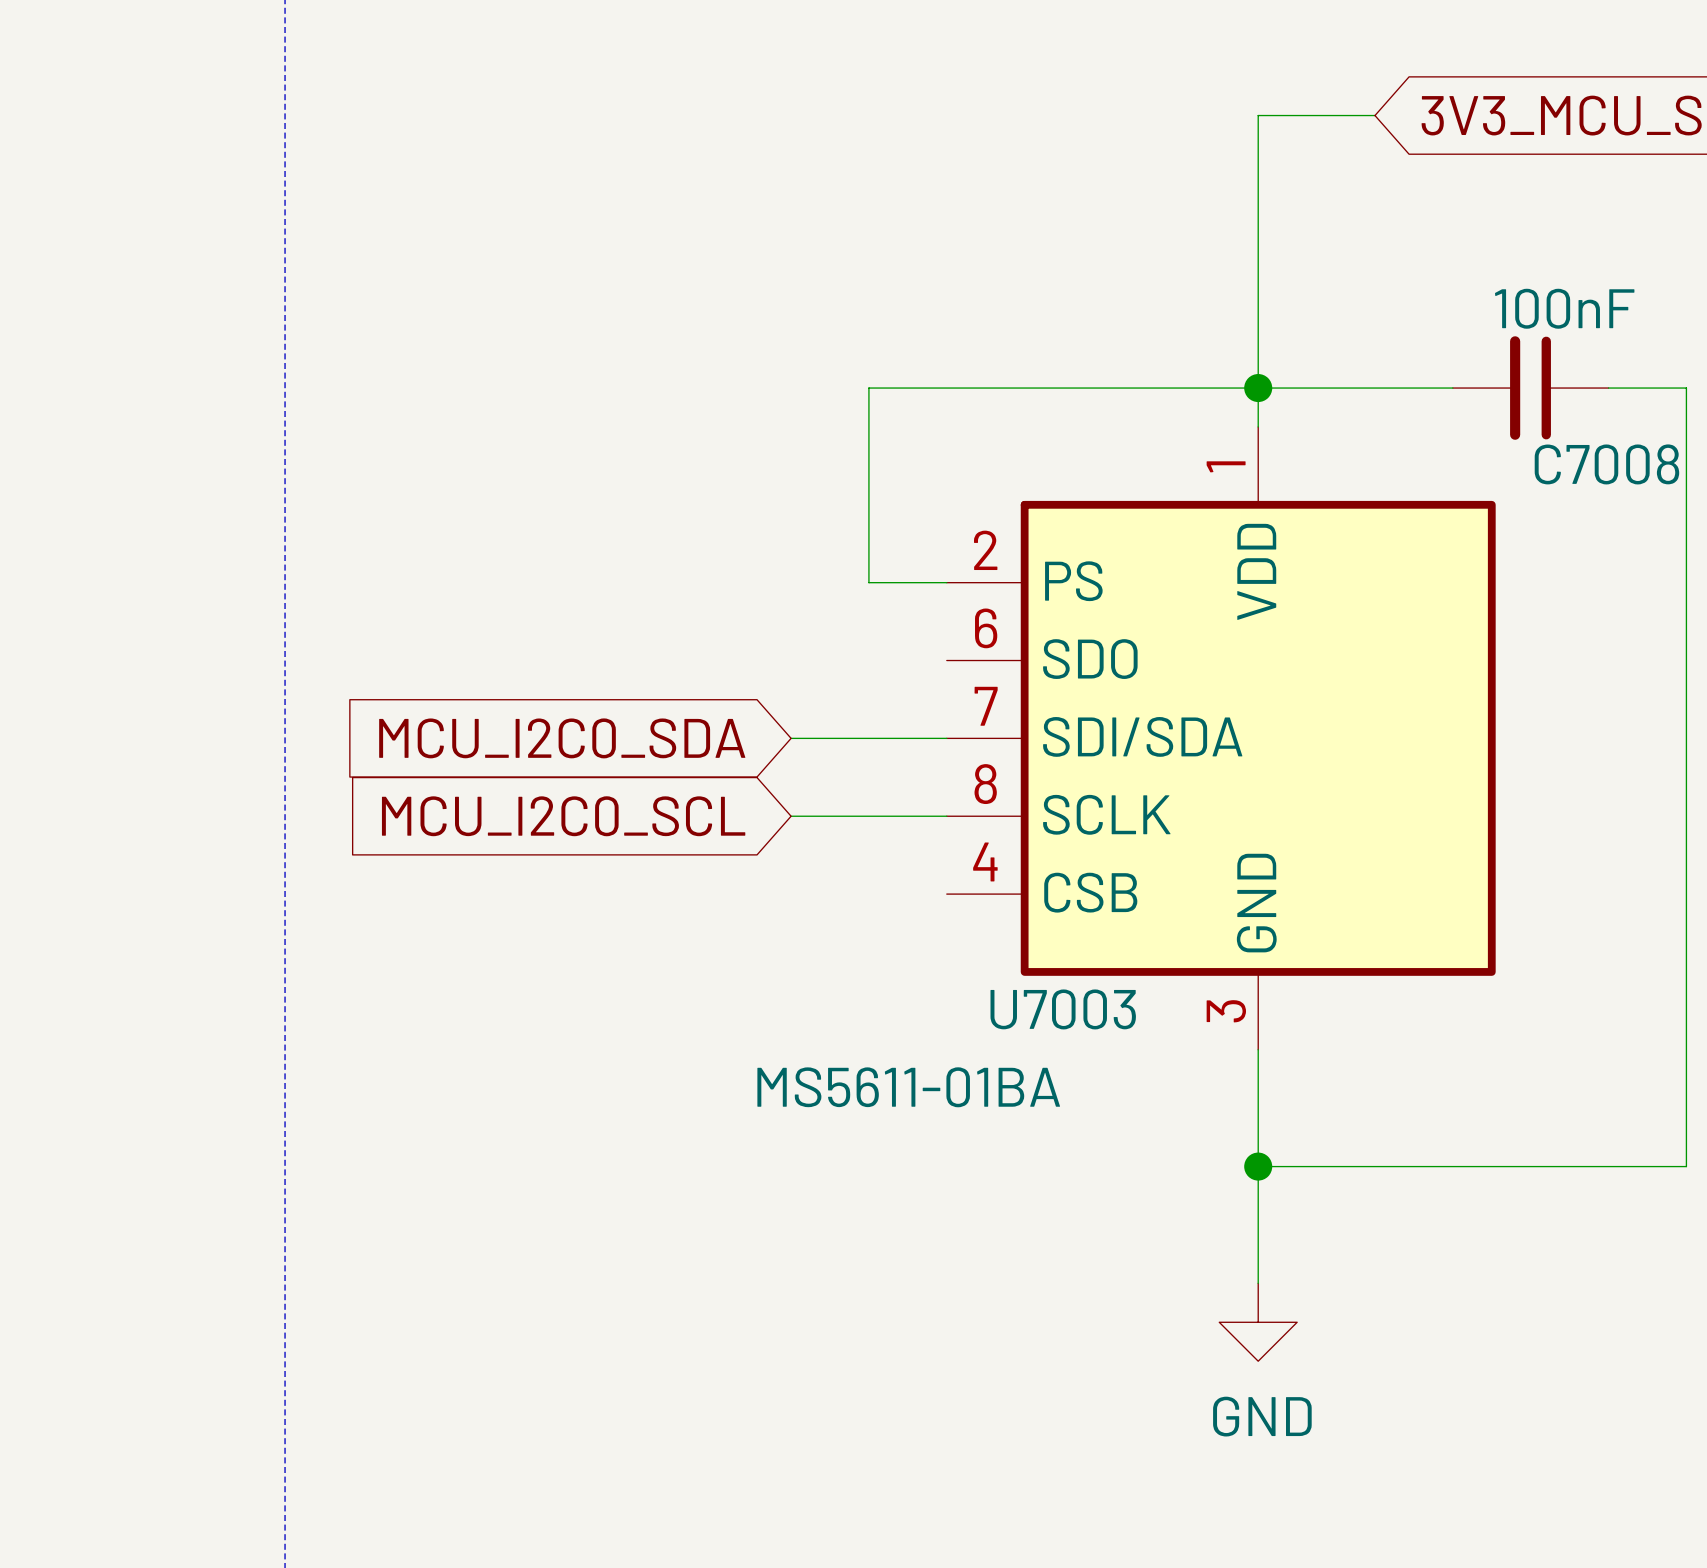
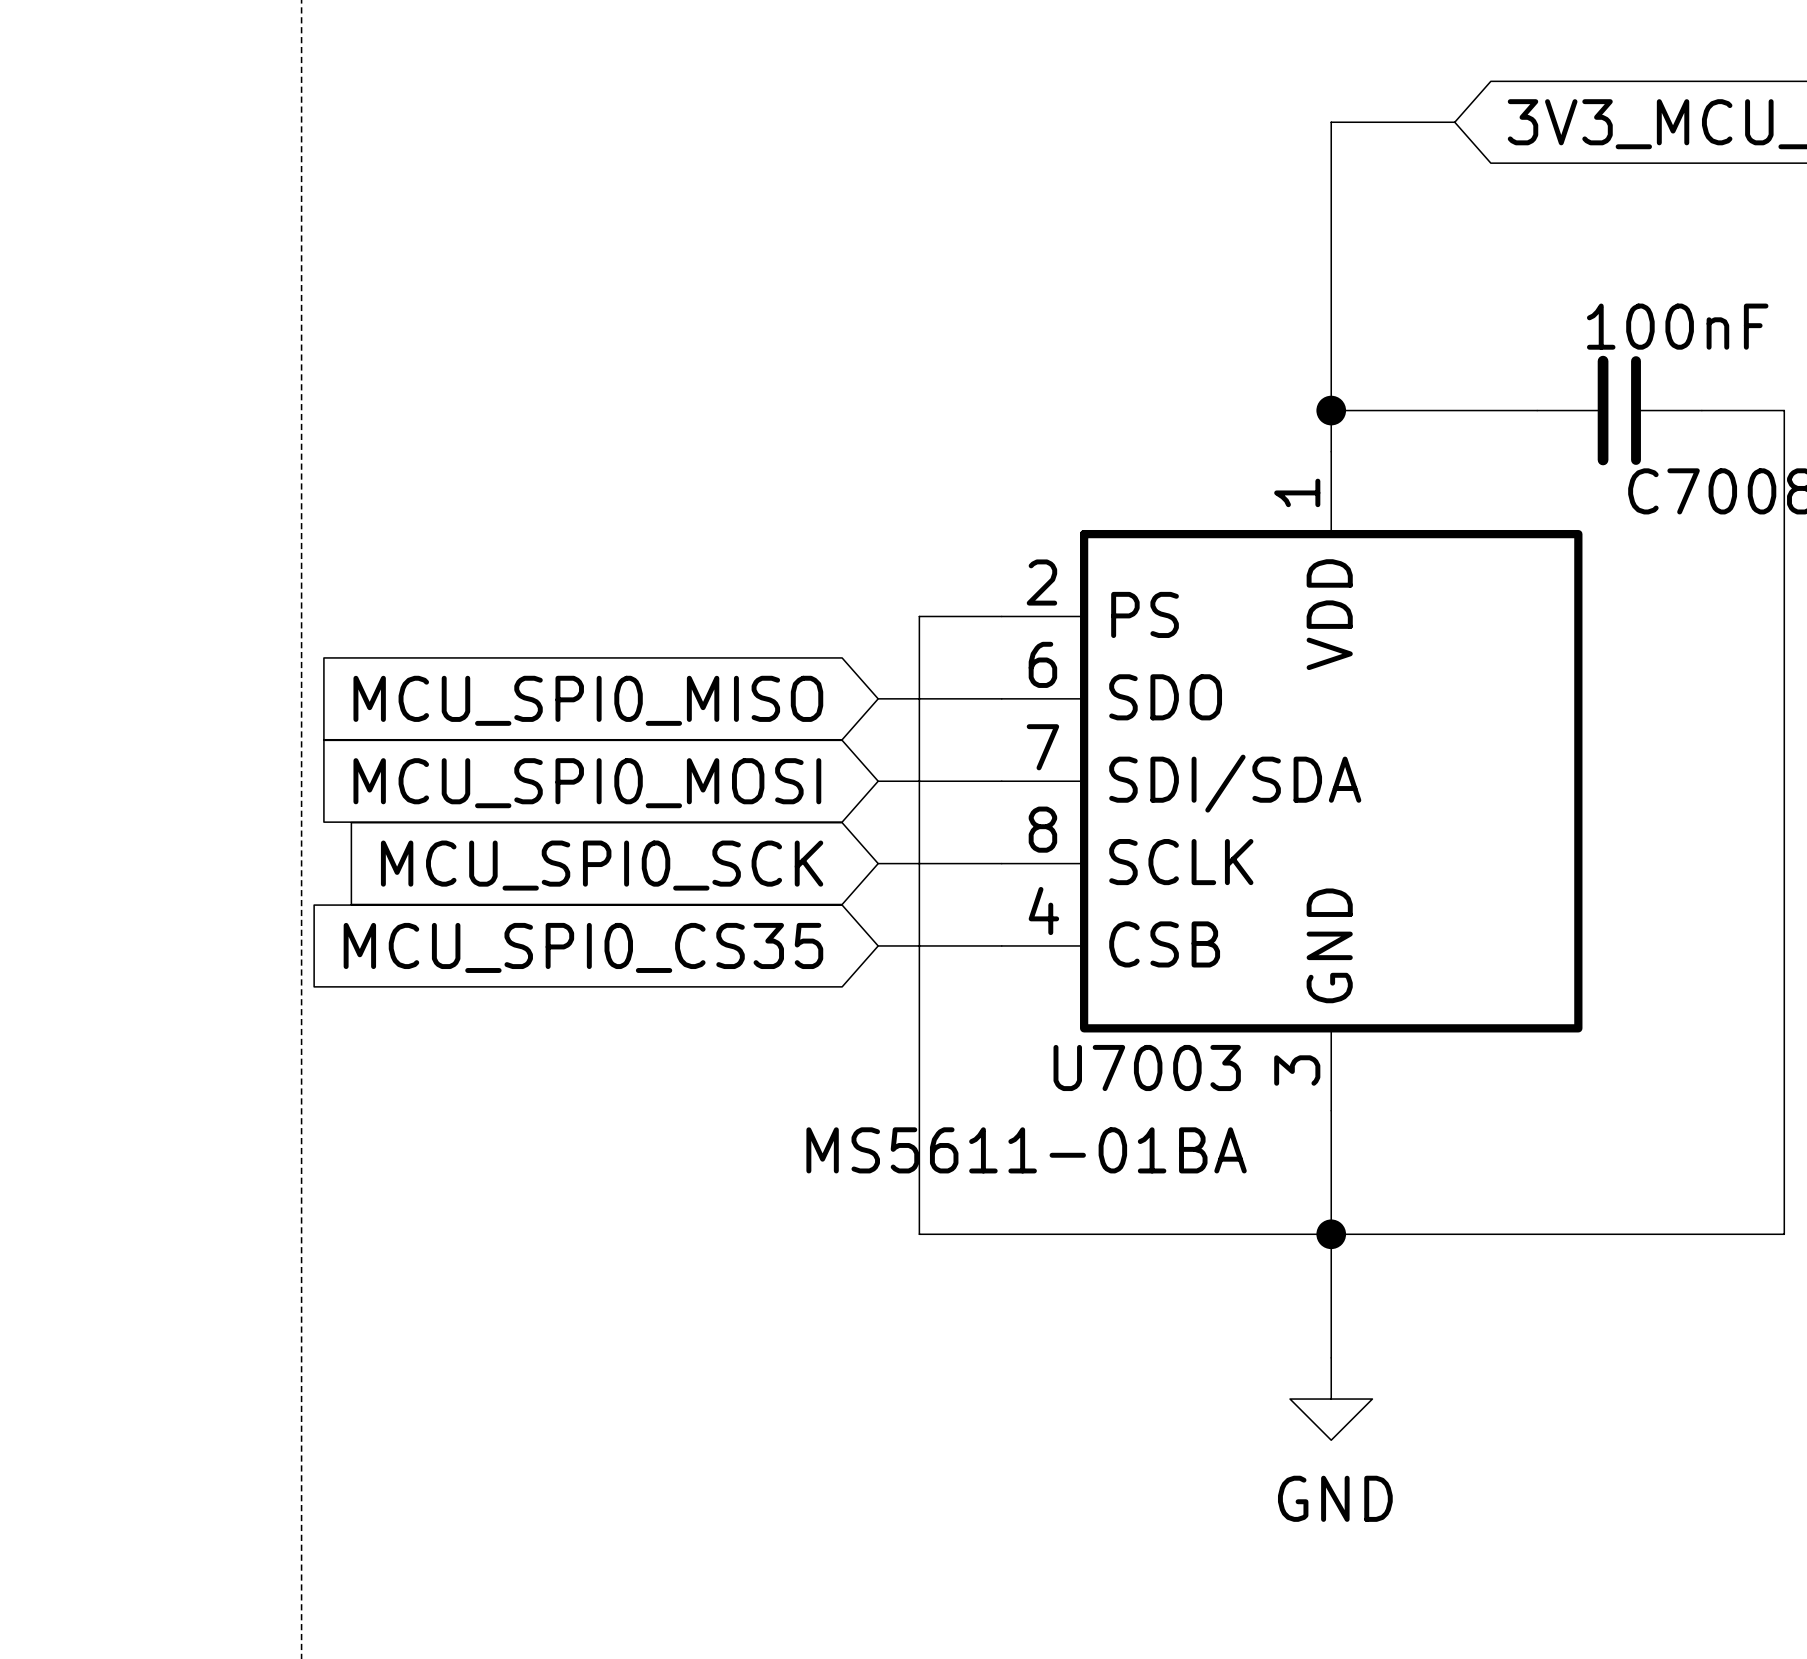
wire: (1258, 388) (868, 388) (868, 582) -> (1331, 1234) (919, 1234) (919, 616)
global label: none -> MCU_SPI0_MISO (588, 700)
wire: none -> (878, 698) (1001, 698)
global label: MCU_I2C0_SDA (562, 738) -> MCU_SPI0_MOSI (587, 783)
wire: (791, 738) (830, 738) -> none
global label: MCU_I2C0_SCL (563, 816) -> MCU_SPI0_SCK (602, 865)
wire: (791, 816) (830, 816) -> none
global label: none -> MCU_SPI0_CS35 (583, 947)
wire: none -> (878, 945) (1001, 945)

